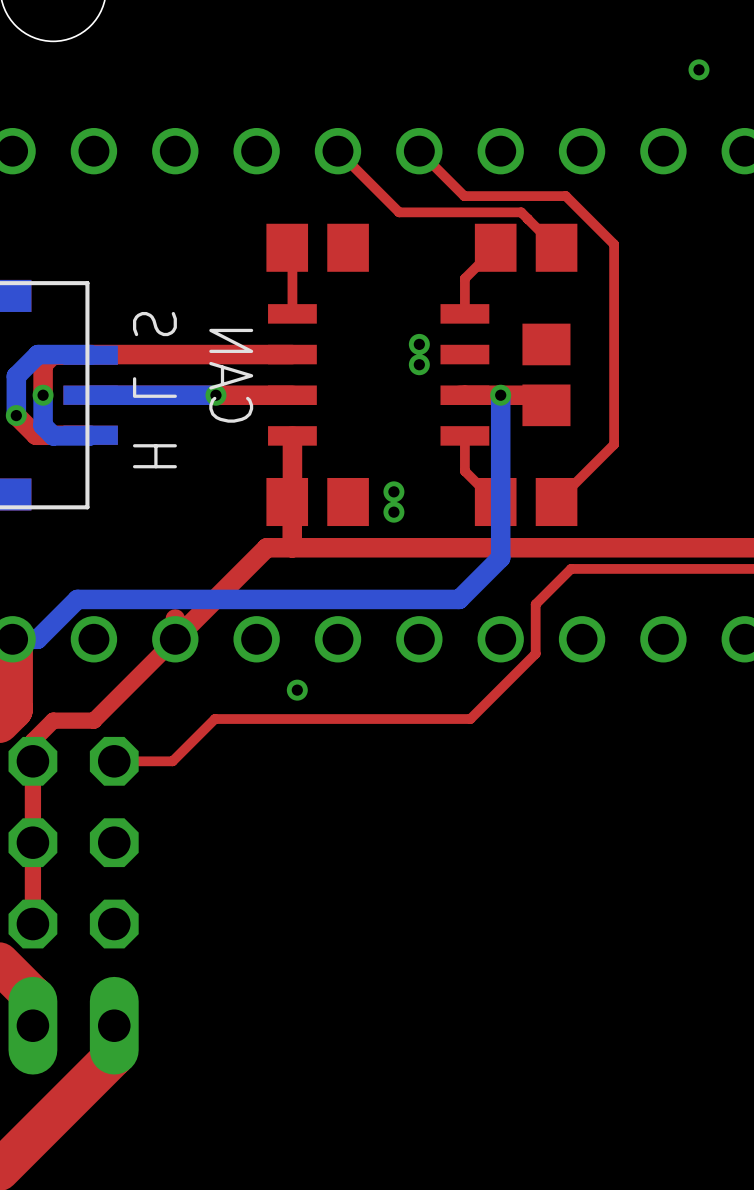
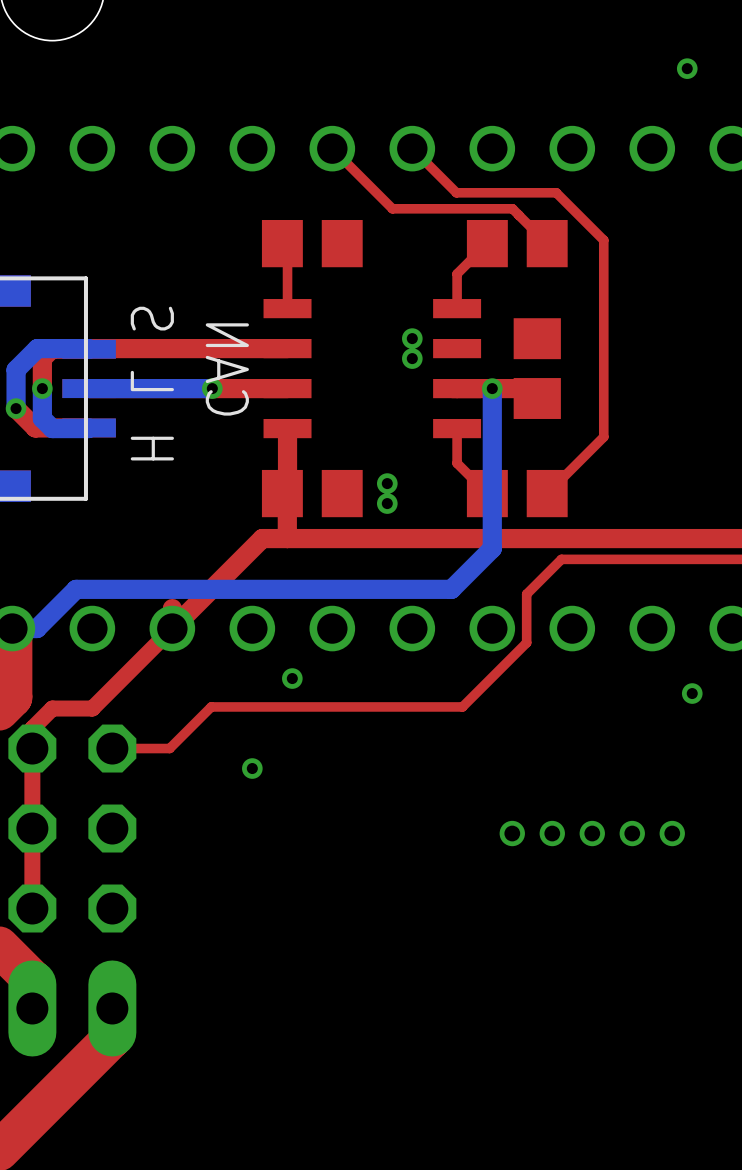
via: none -> (692, 693)
via: none -> (252, 768)
via: none -> (512, 833)
via: none -> (552, 833)
via: none -> (592, 833)
via: none -> (632, 833)
via: none -> (672, 833)

